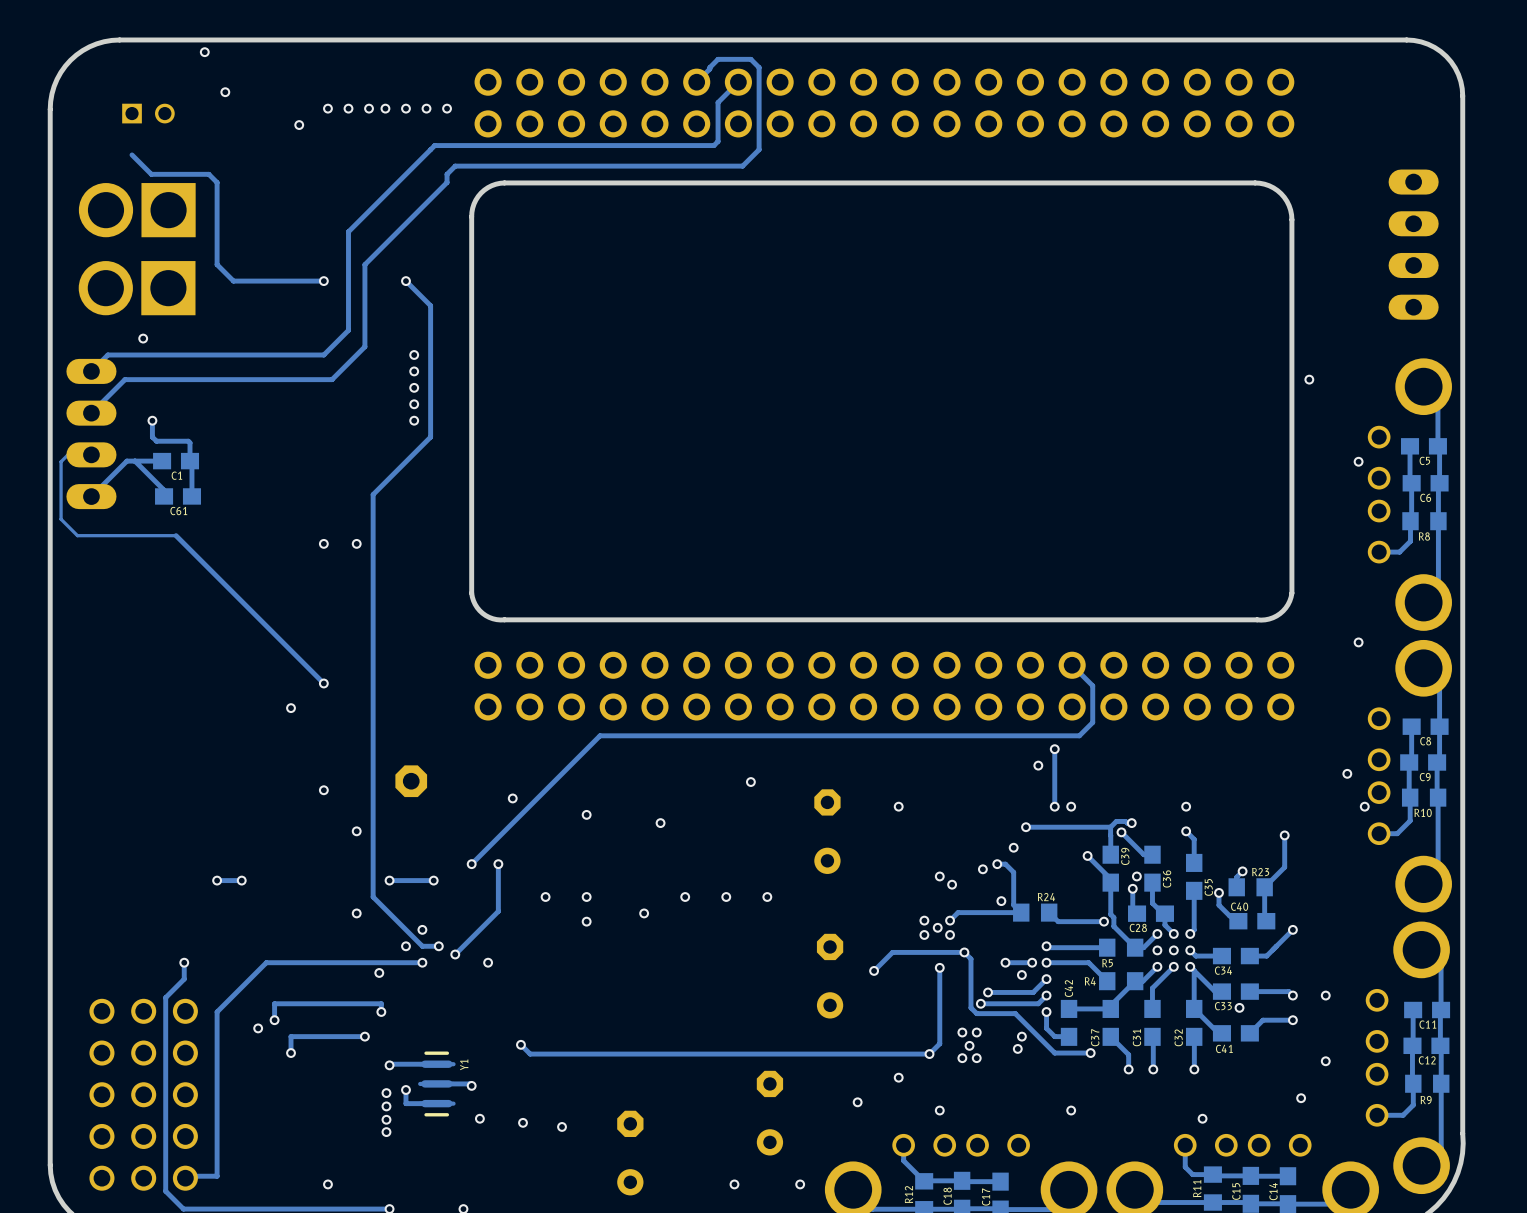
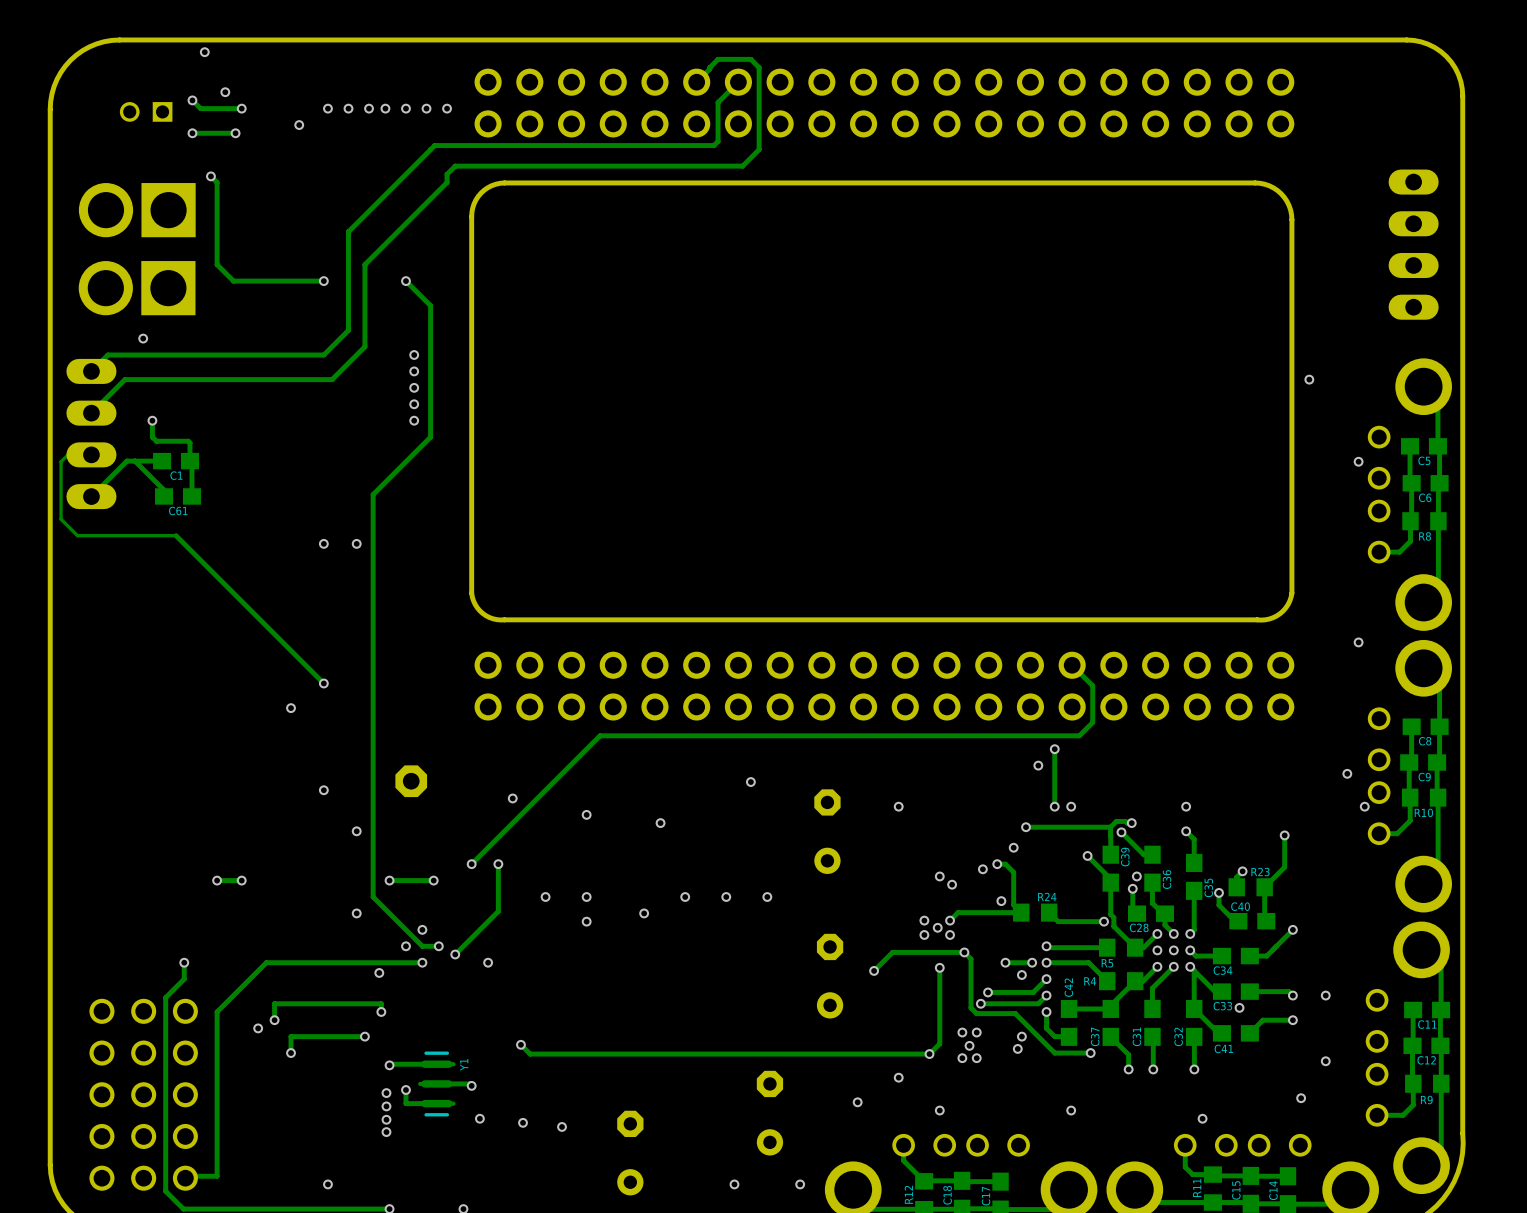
track: none -> (192, 100) (200, 108) (241, 108)
via: none -> (192, 100)
via: none -> (241, 108)
part rotation: 0° (148, 113) -> 180° (146, 111)
via: none -> (192, 133)
track: none -> (235, 133) (192, 133)
via: none -> (235, 133)
track: (132, 154) (151, 174) (208, 174) (210, 176) -> none
via: none -> (210, 176)

